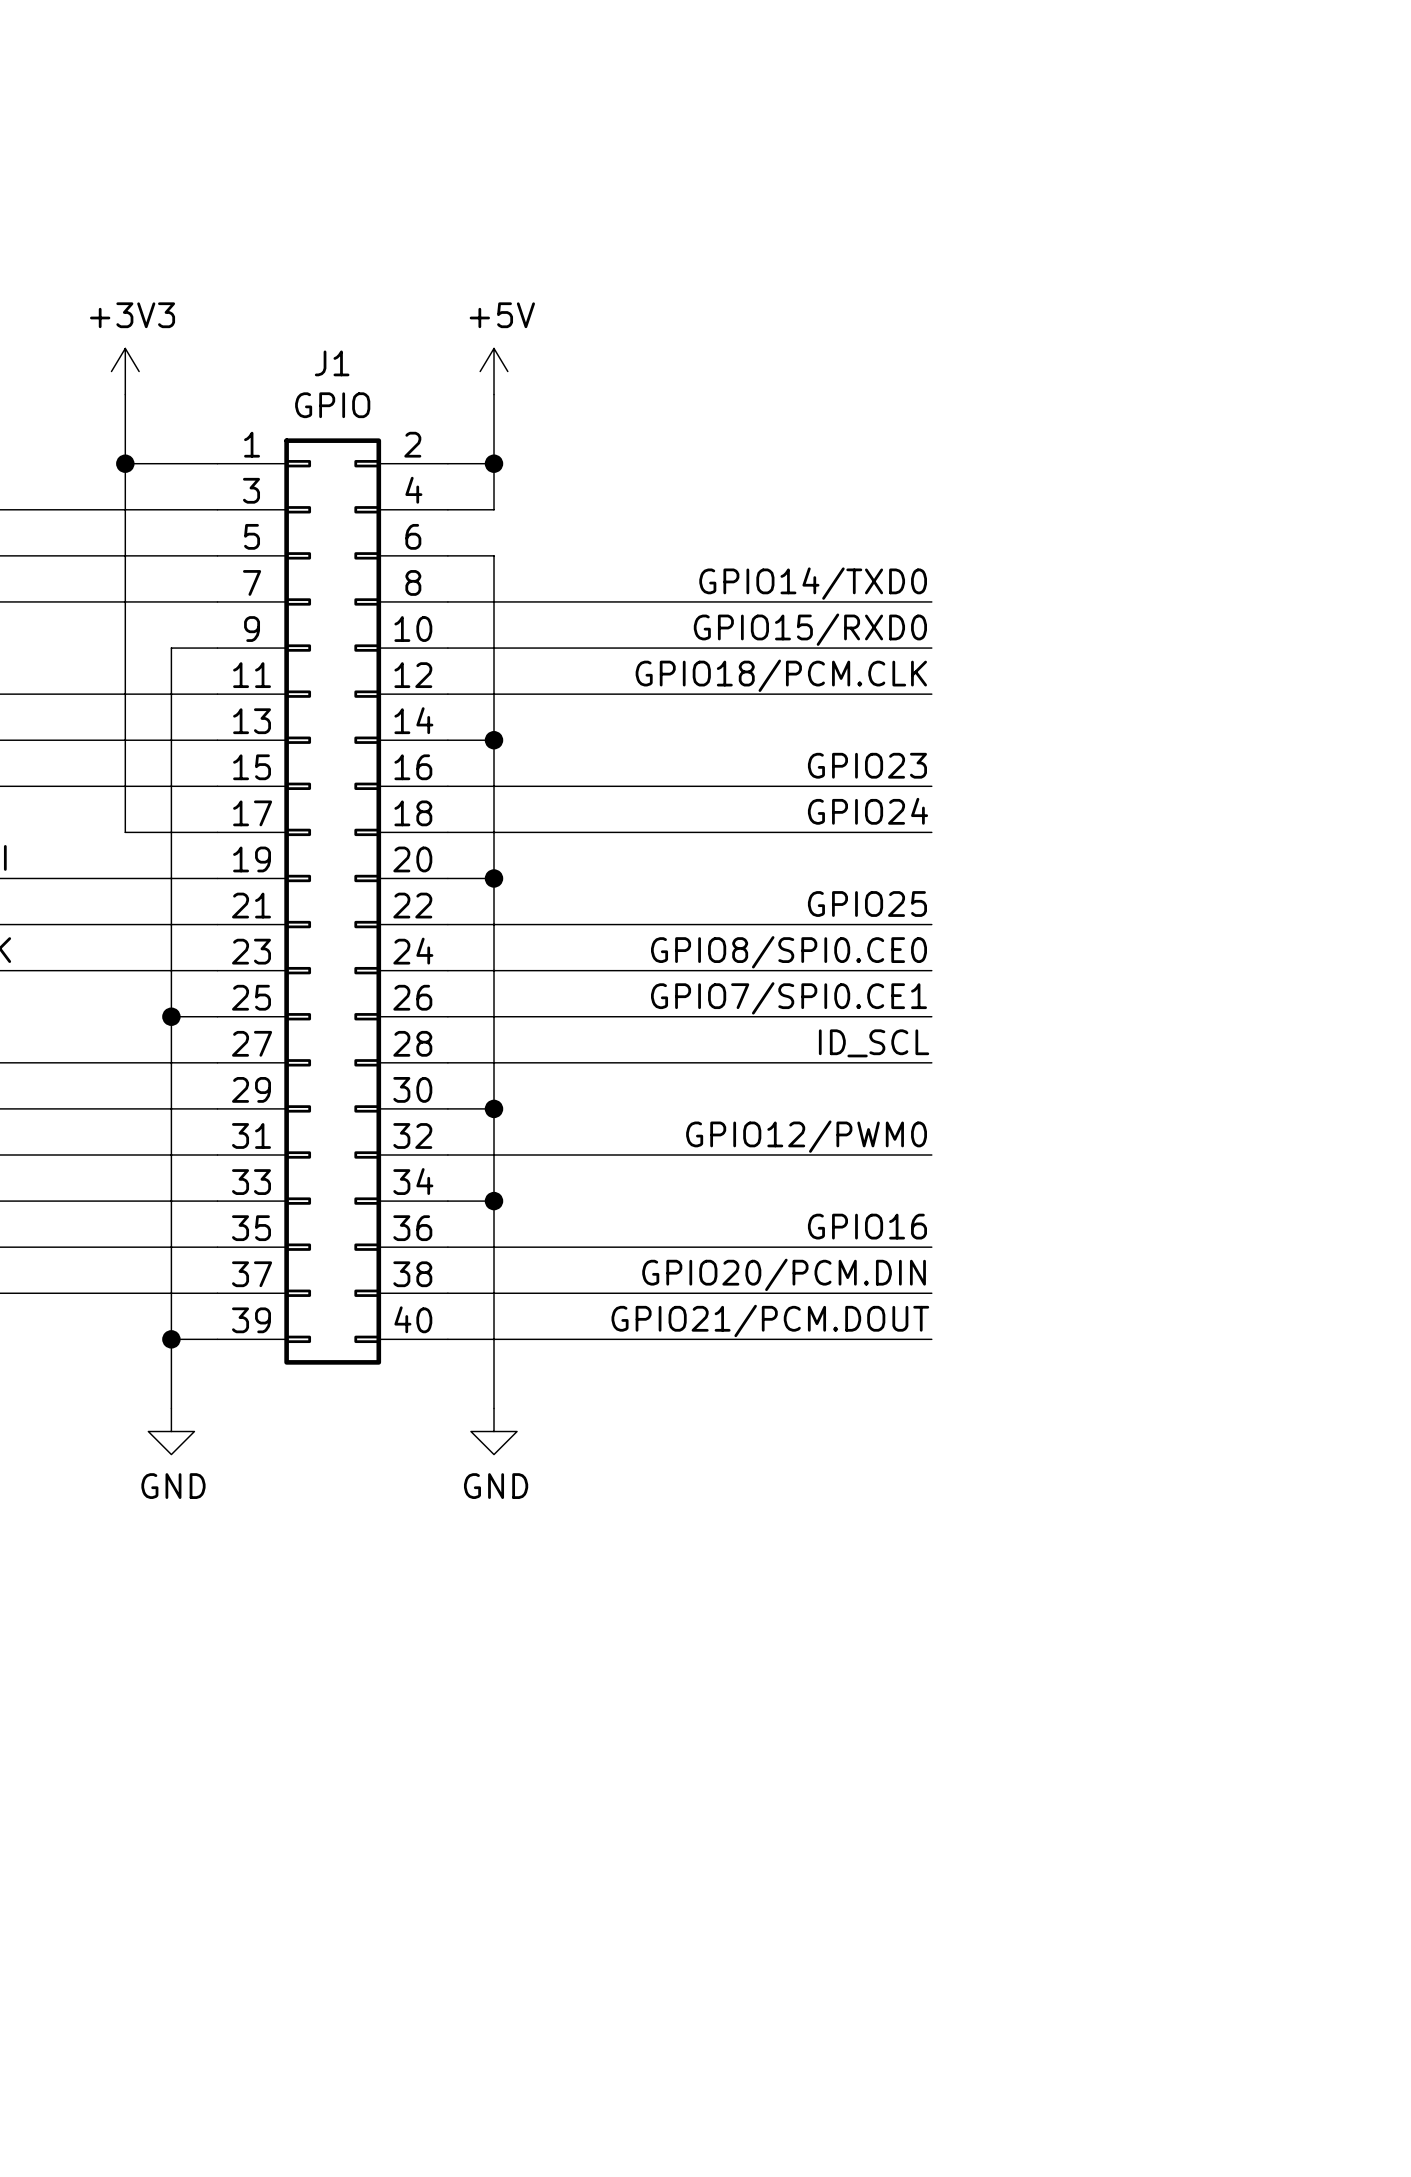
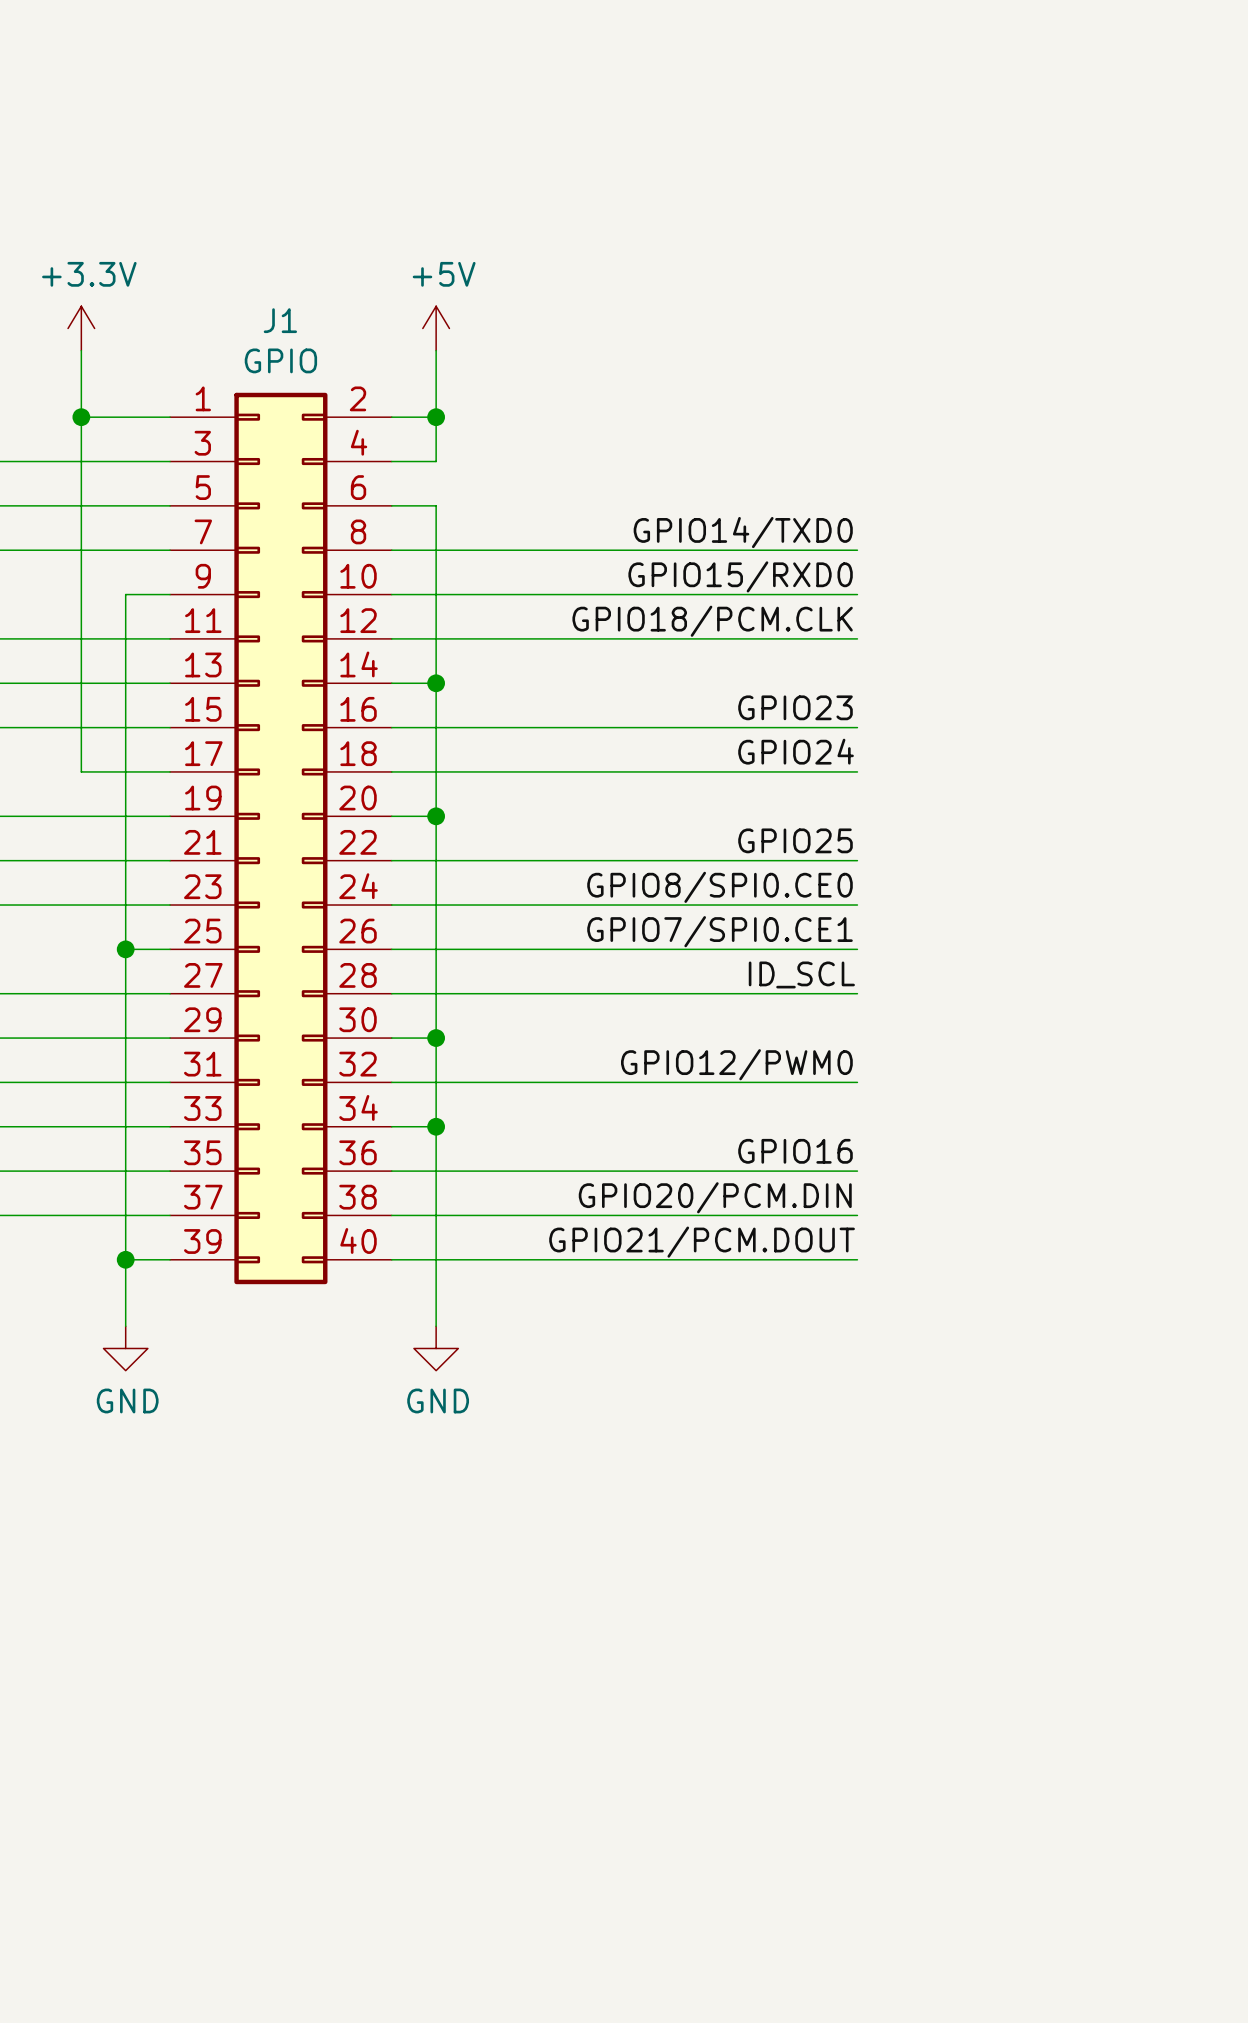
power symbol: +3V3 (125, 371) -> +3.3V (81, 328)

